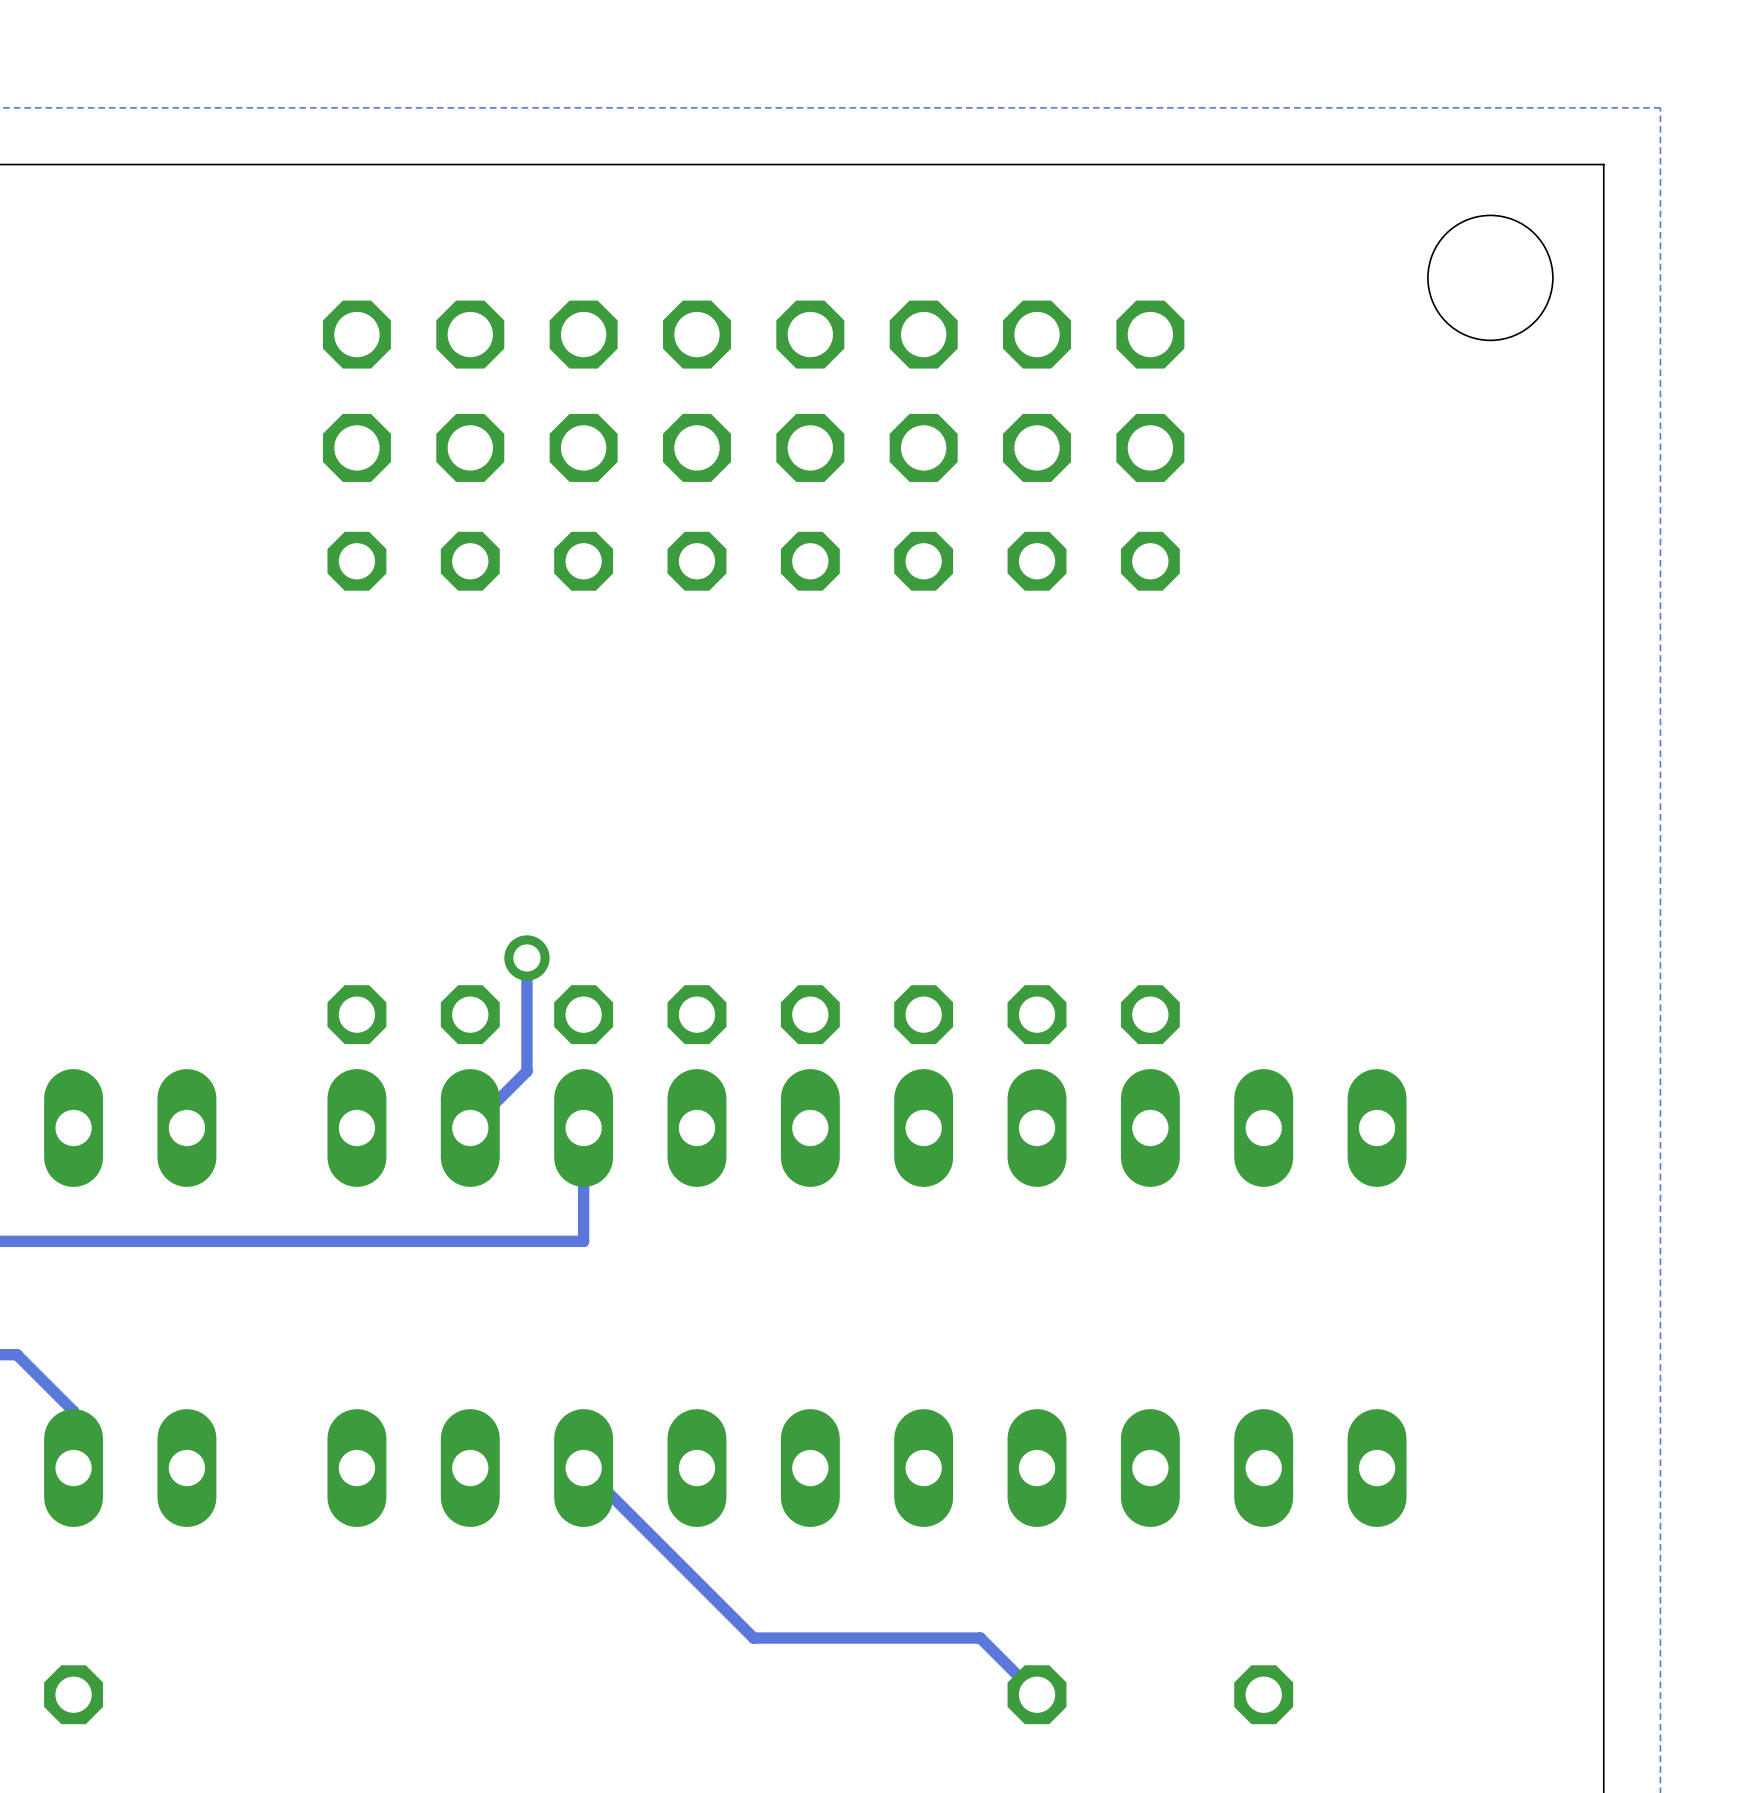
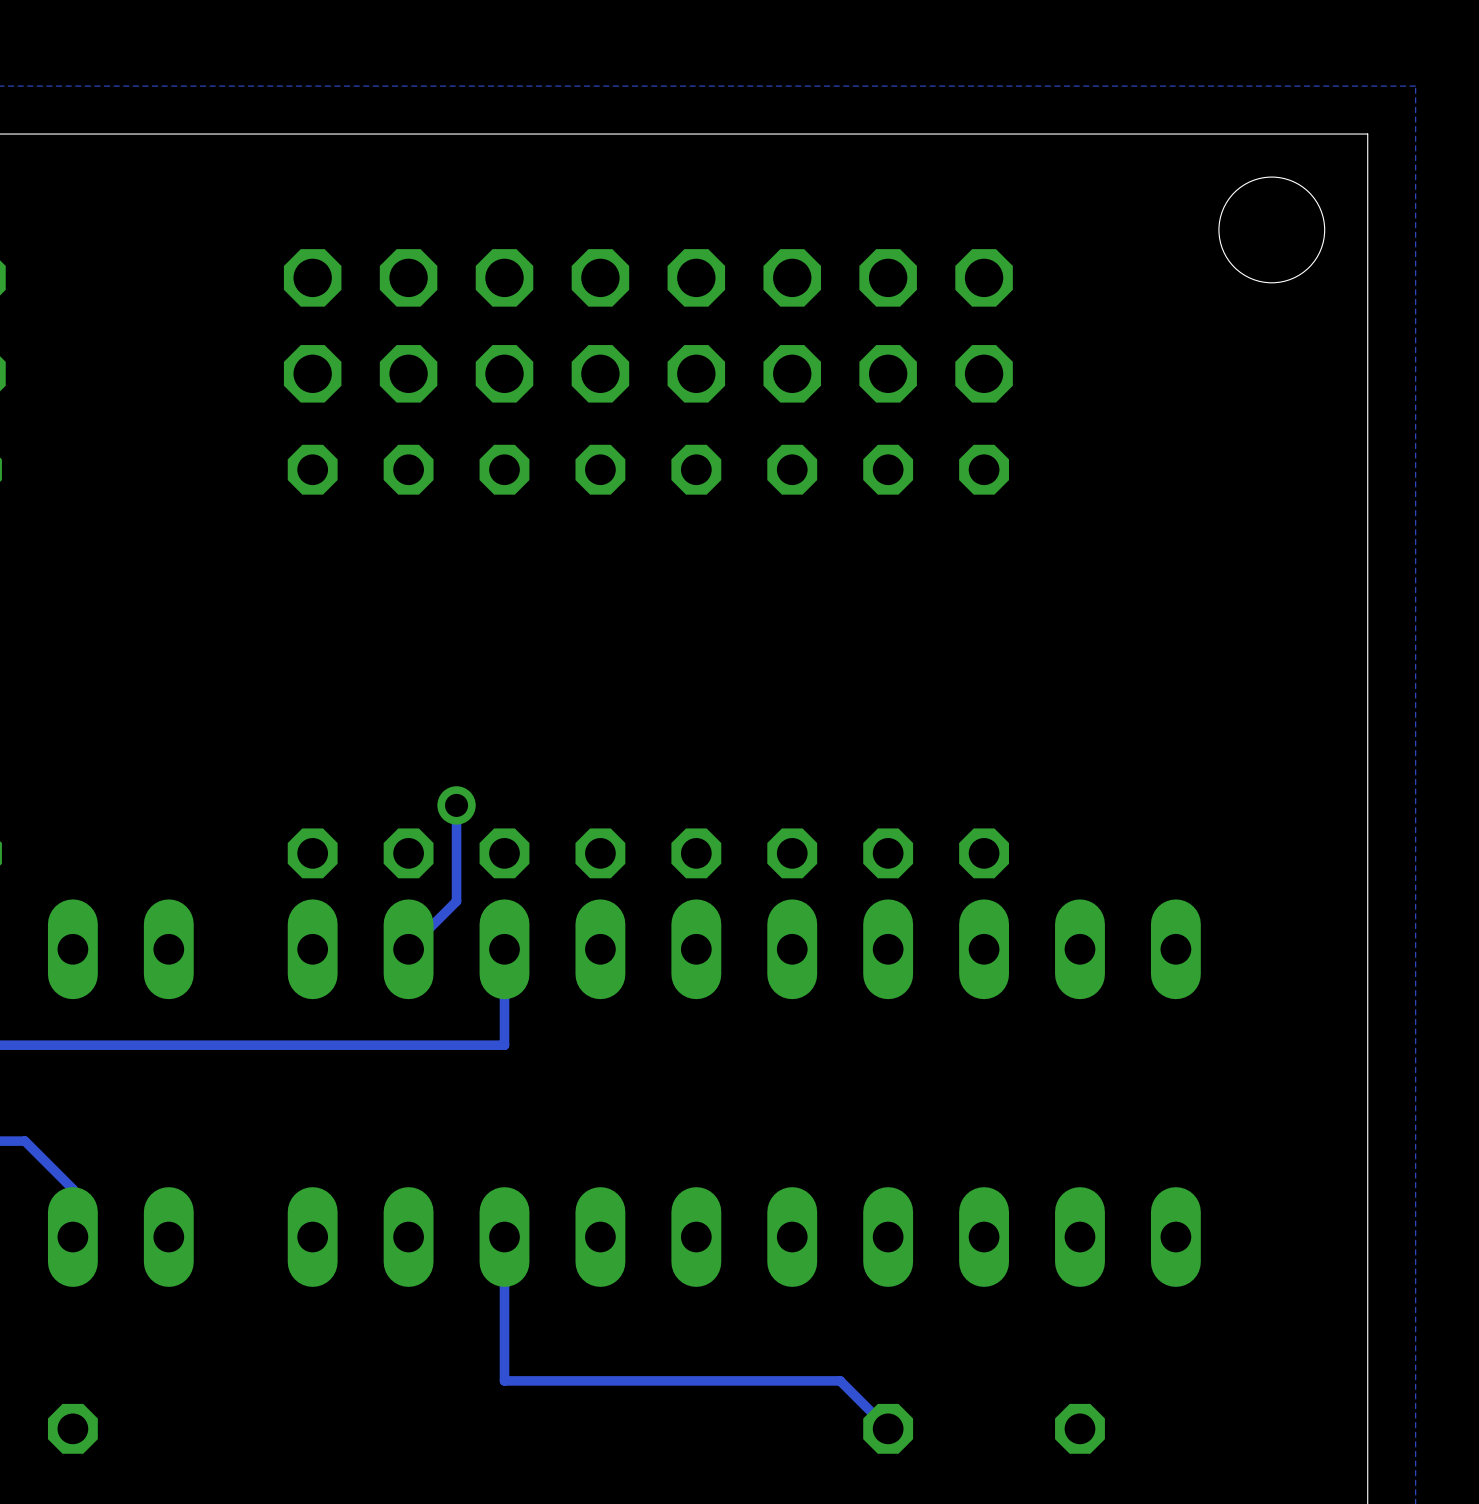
track: (583, 1468) (753, 1638) -> (504, 1237) (504, 1380) (648, 1380)

